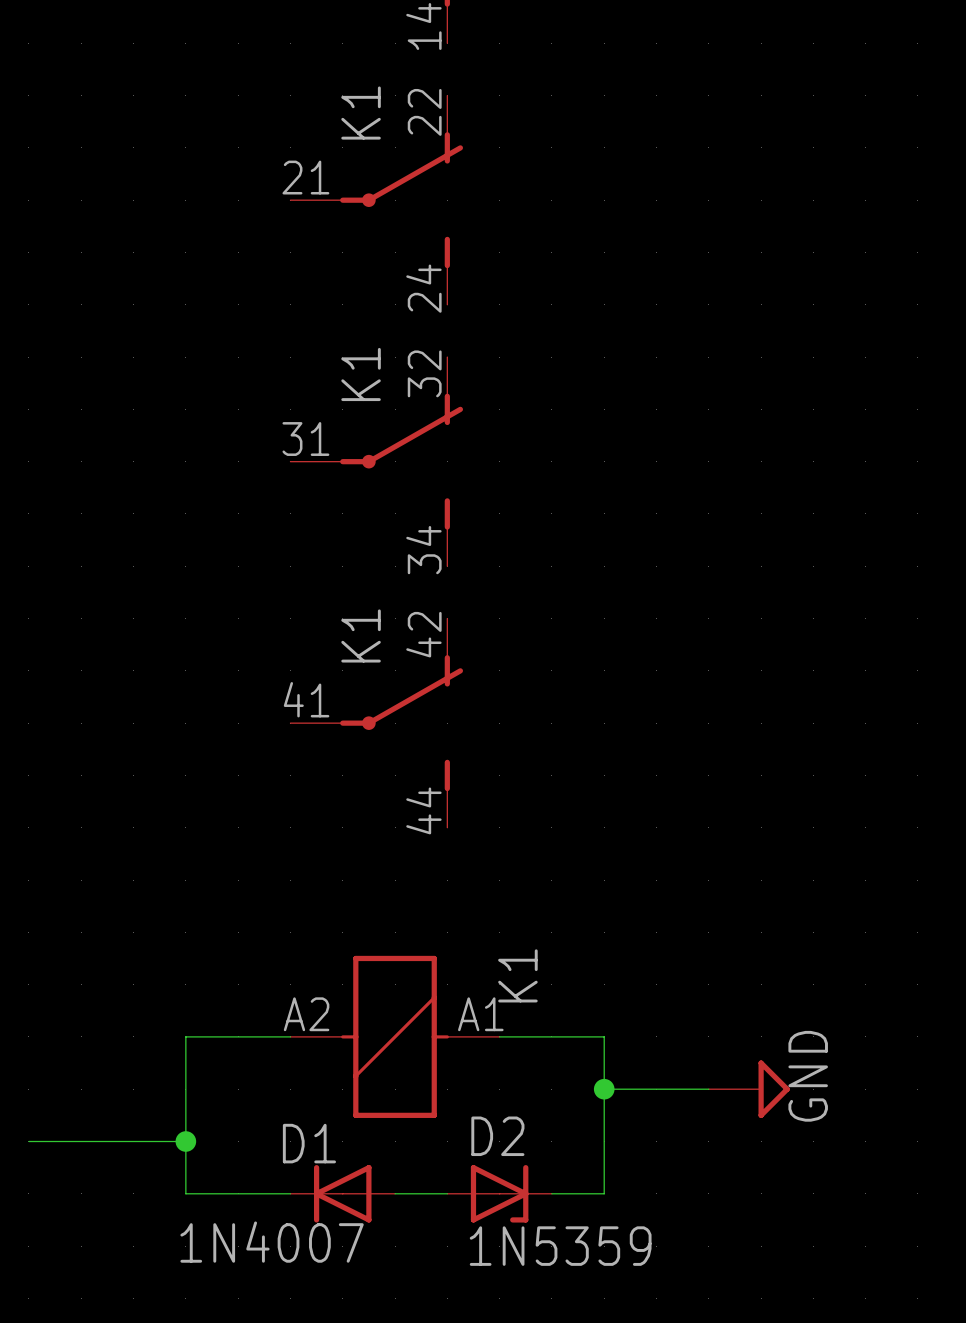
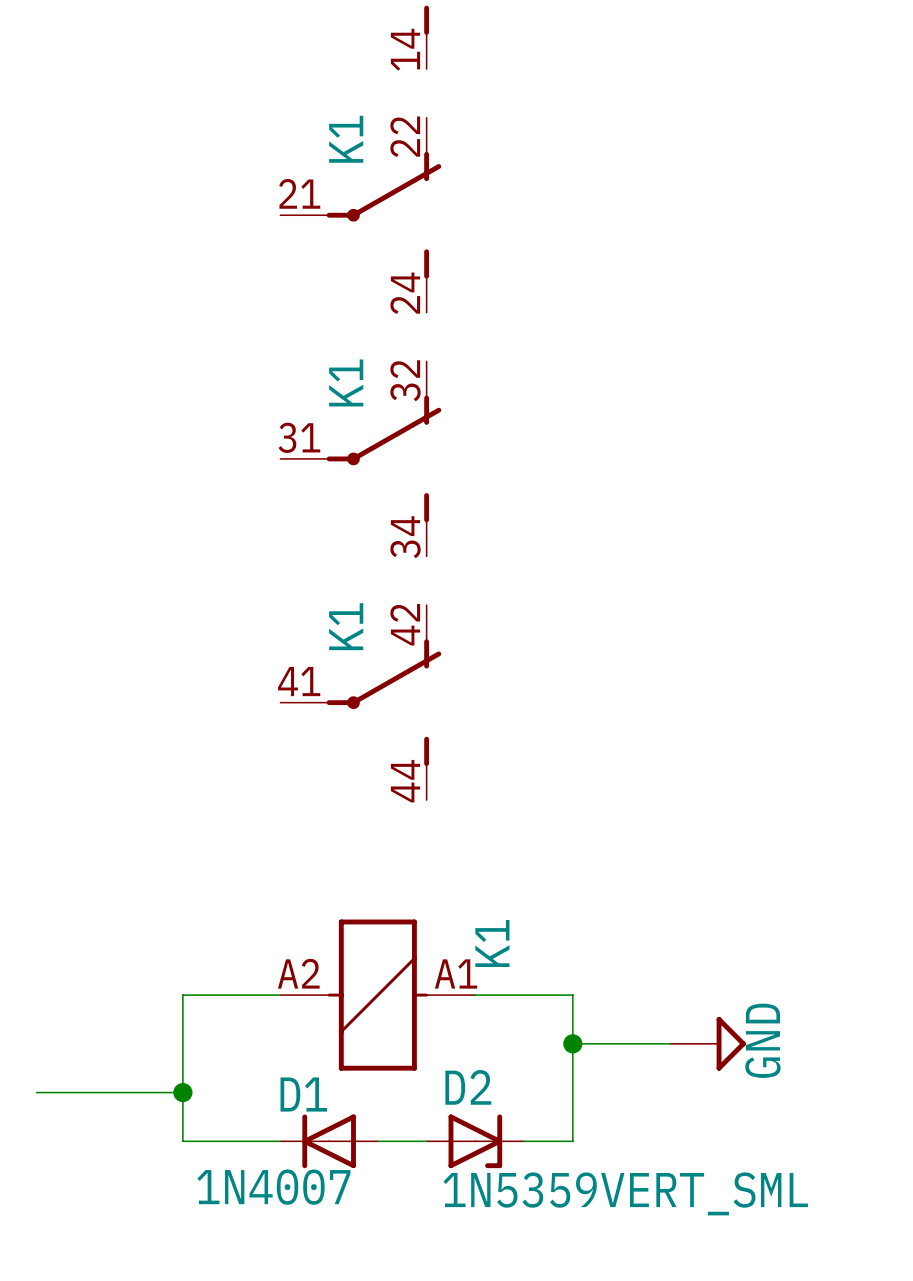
D2 value: 1N5359 (560, 1246) -> 1N5359VERT_SML (625, 1193)

